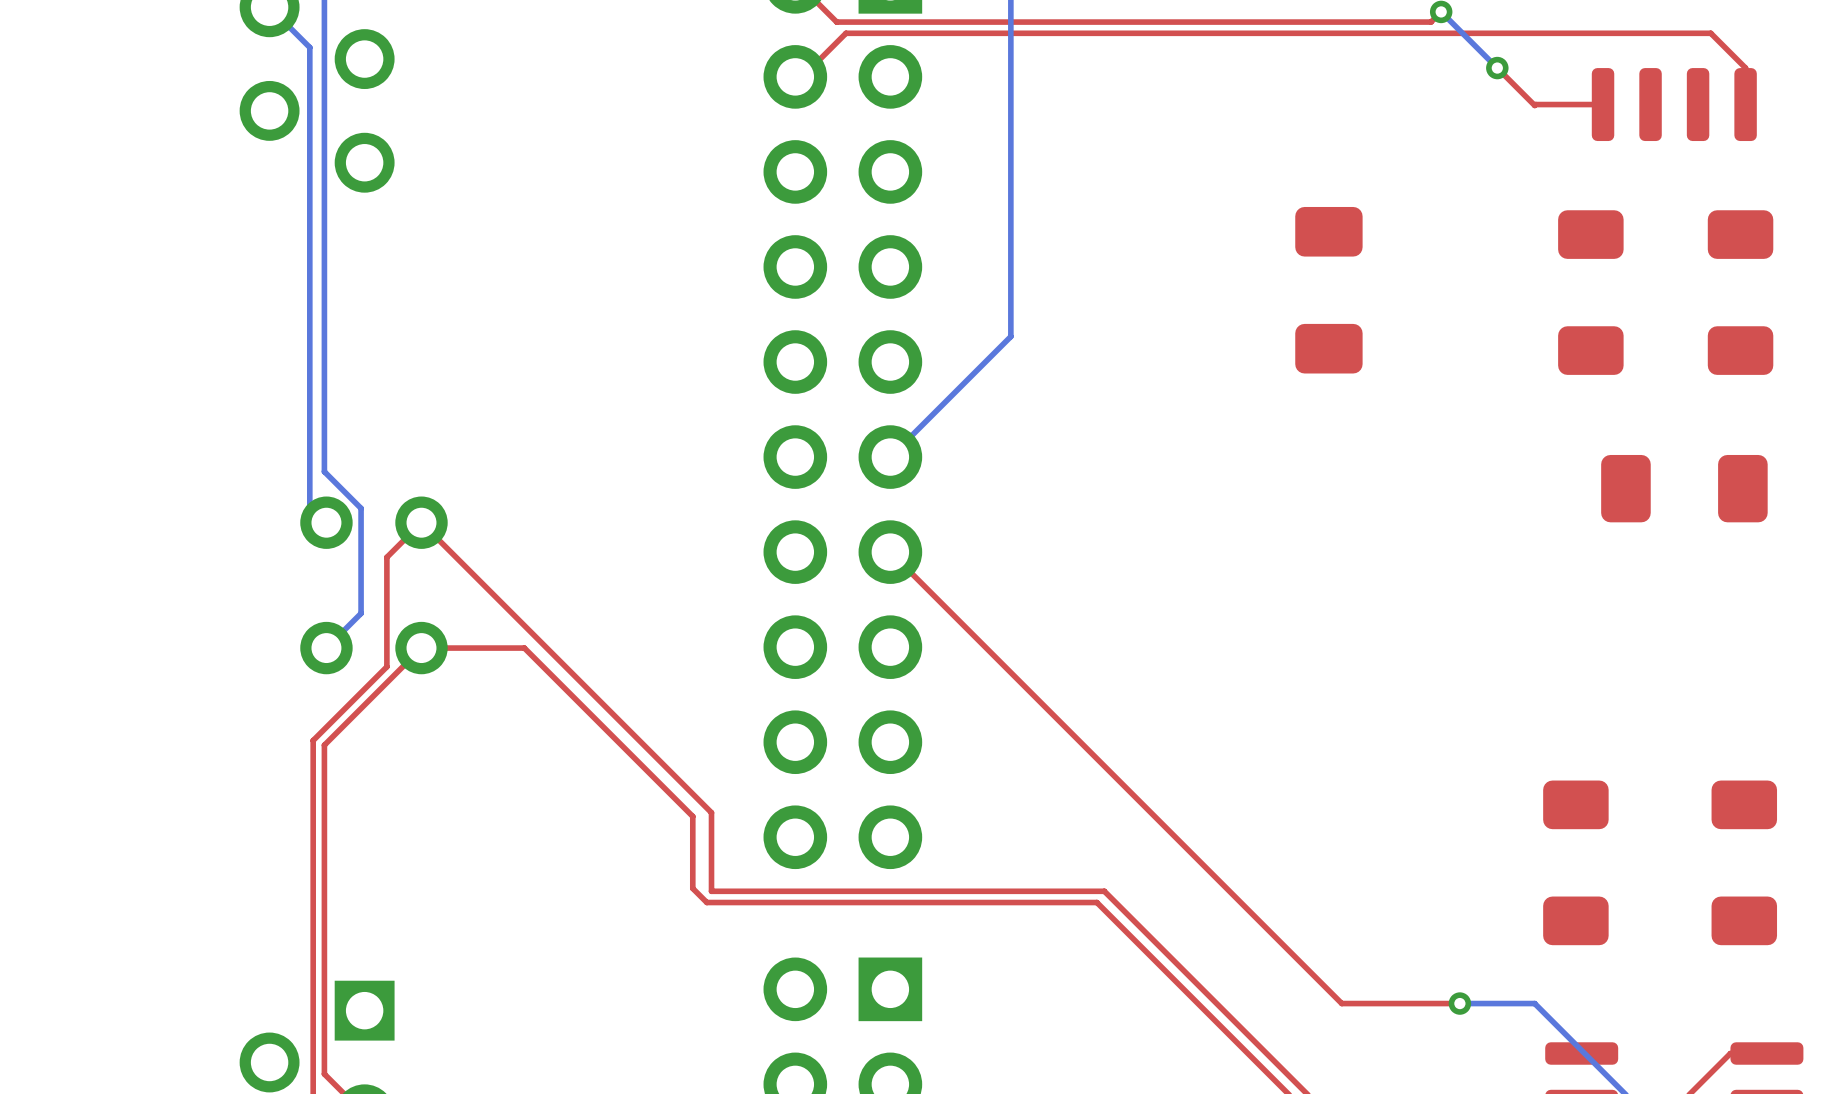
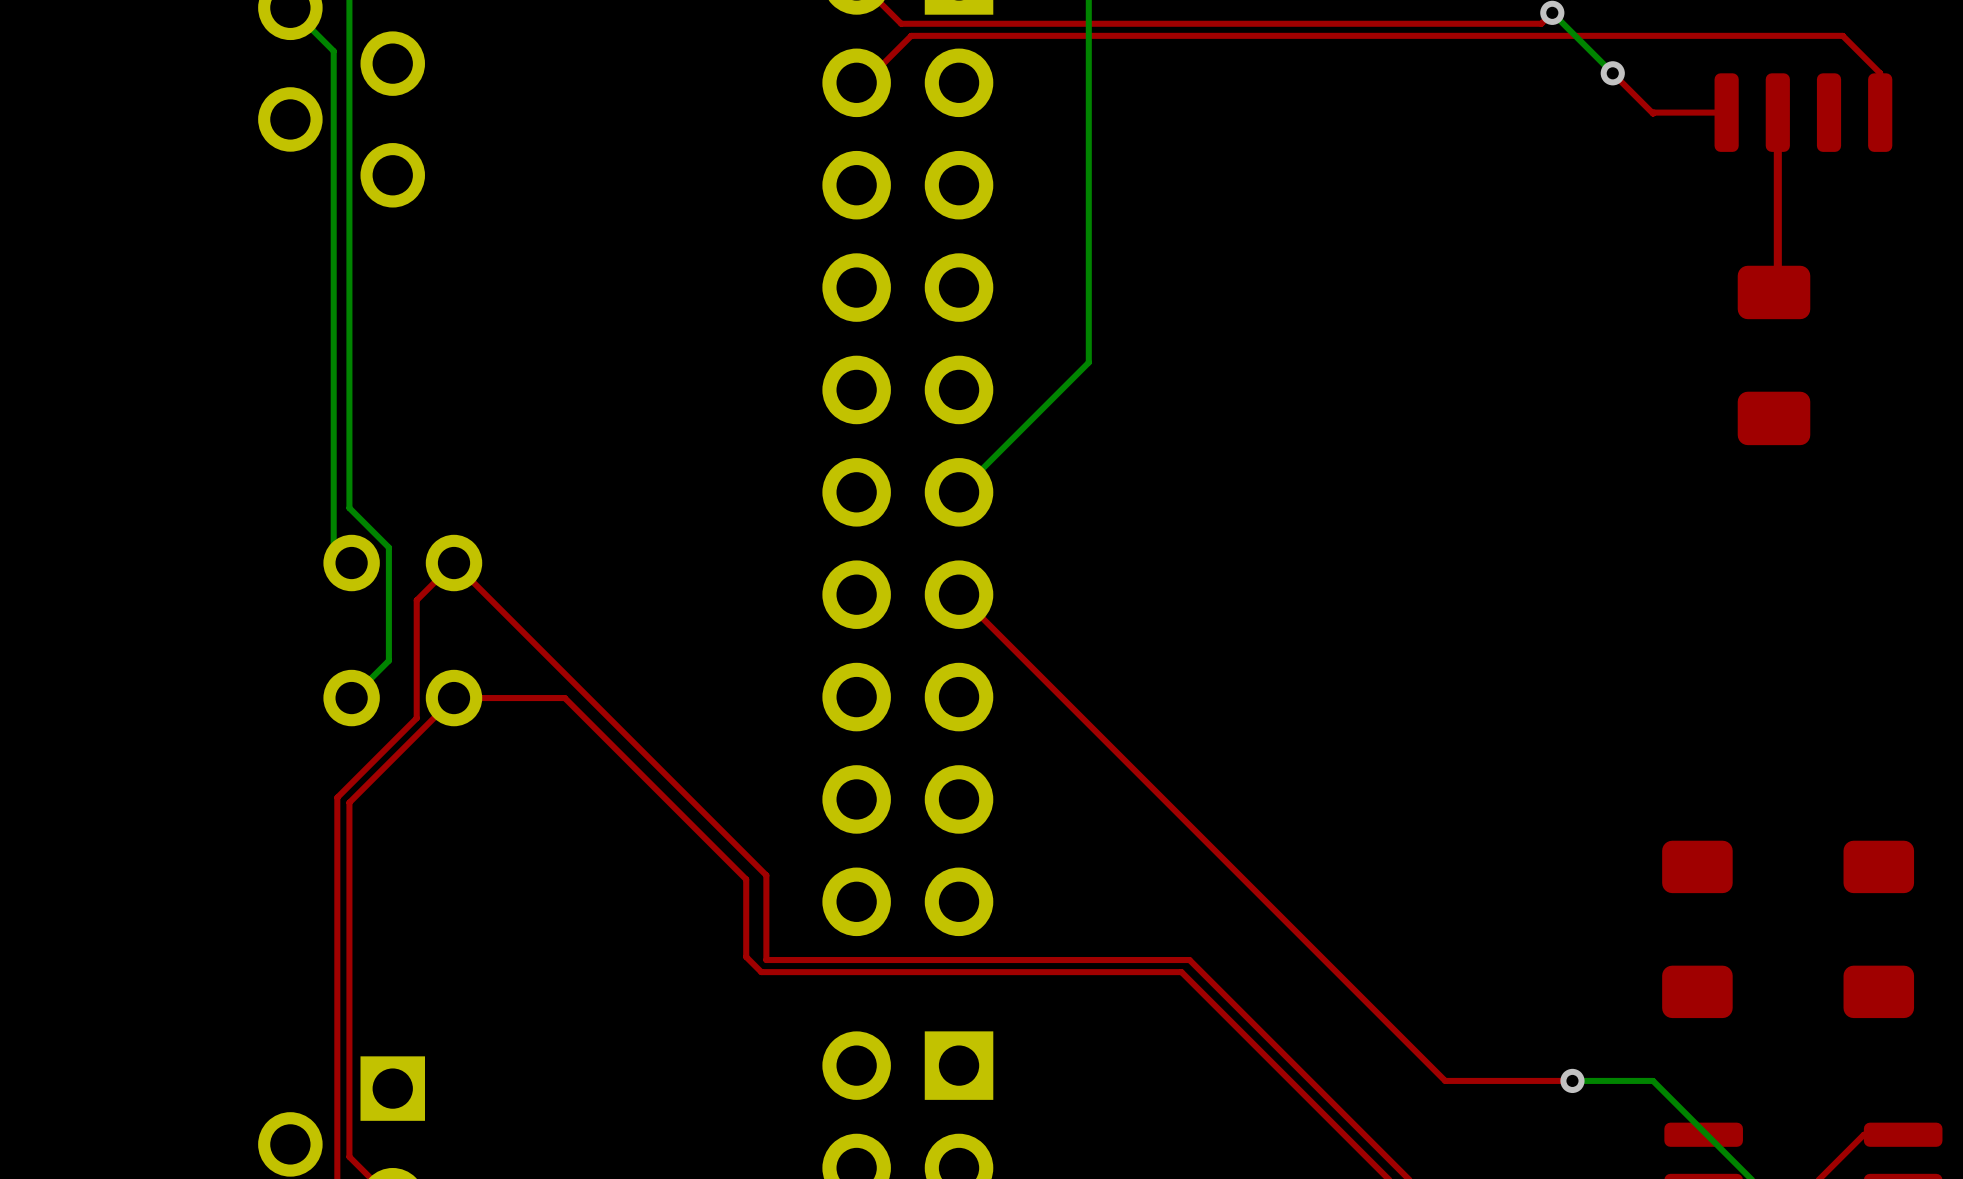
top track: none -> (1777, 112) (1777, 288) (1773, 292)
part: (1328, 290) -> none
part: (1590, 292) -> none
part: (1740, 292) -> none
part: none -> (1773, 355)
part: (1684, 488) -> none

